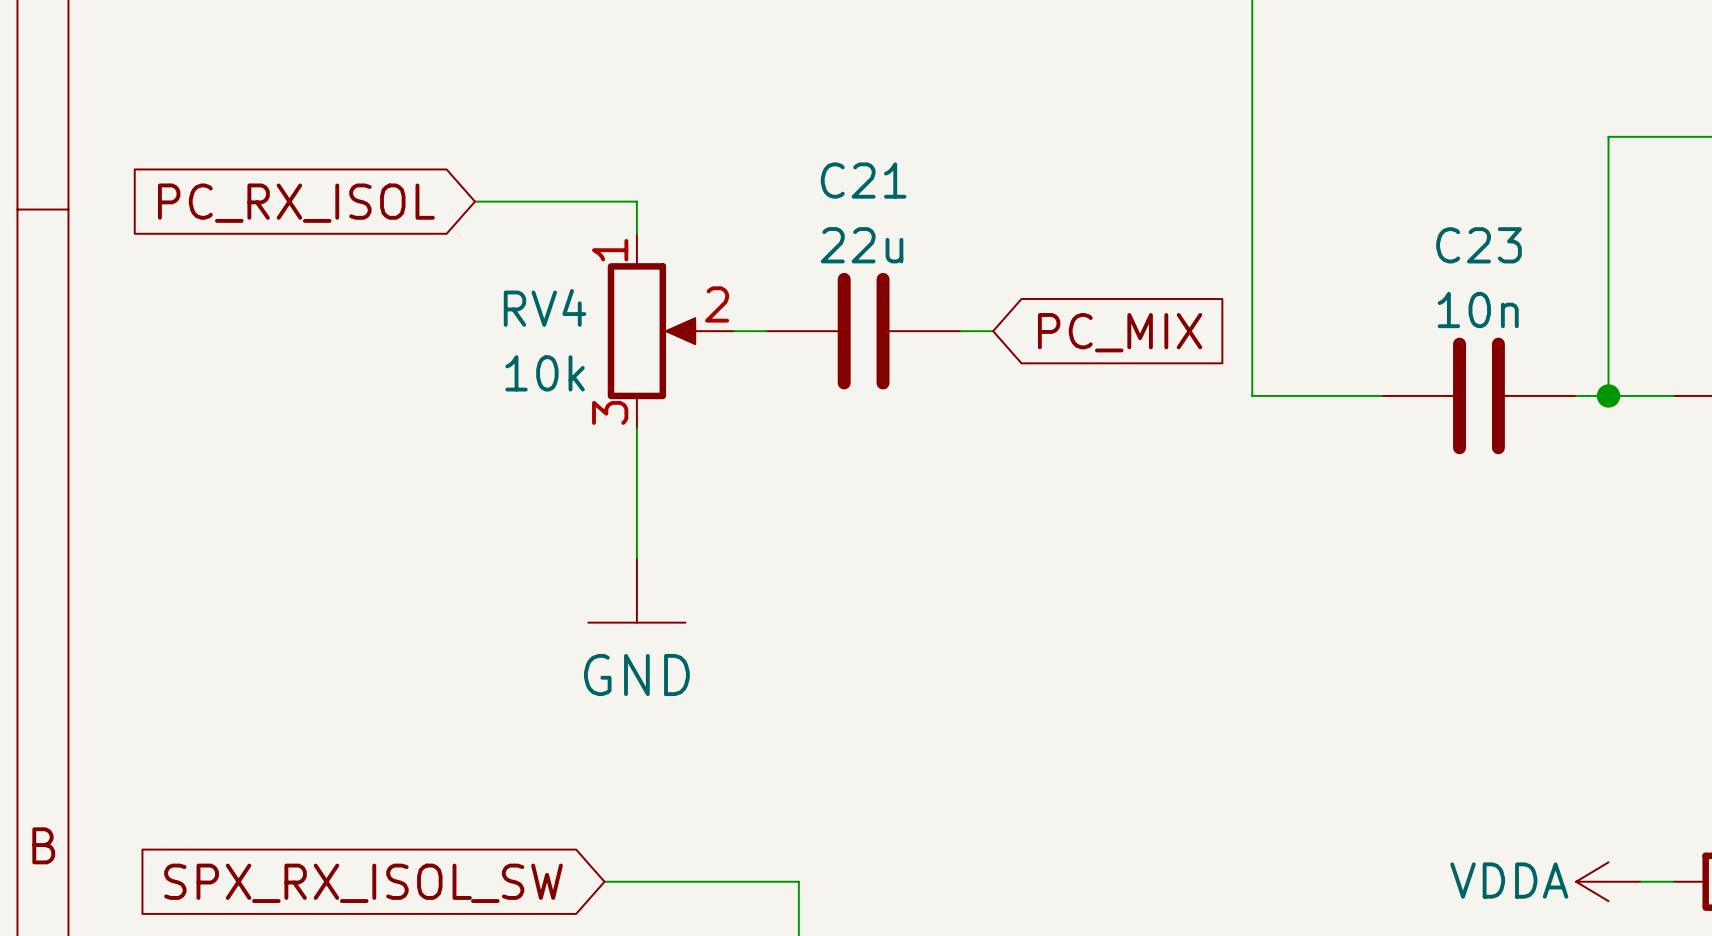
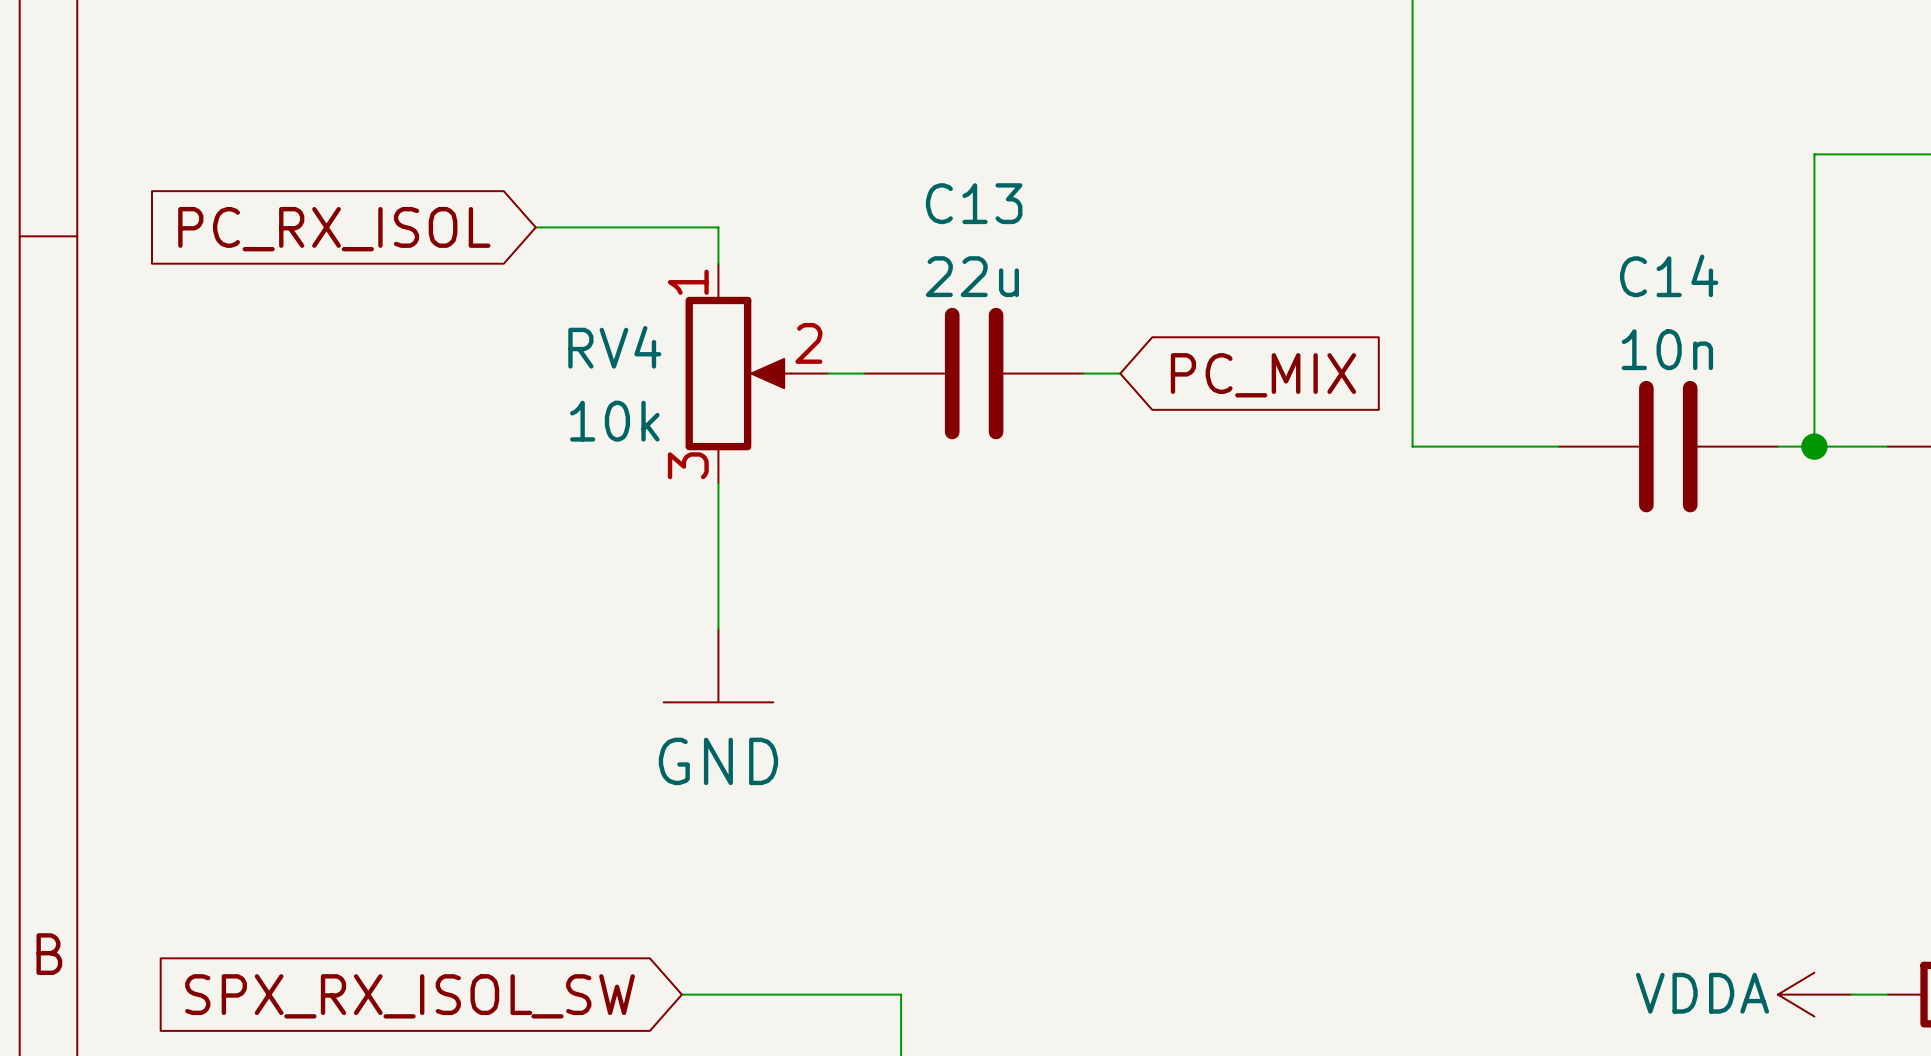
C21 name: C21 (863, 180) -> C13 (974, 203)
C23 name: C23 (1478, 245) -> C14 (1669, 275)

